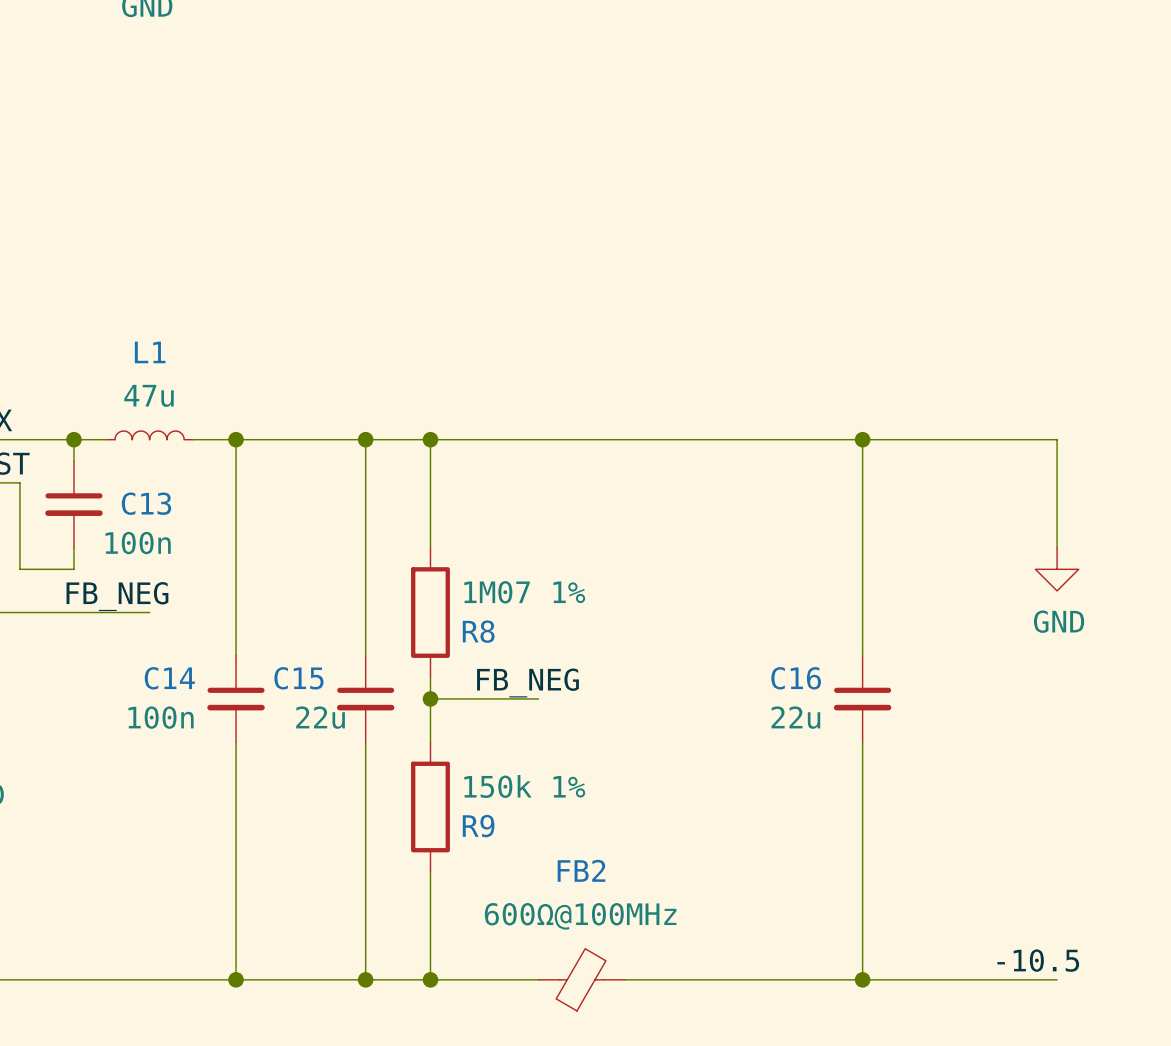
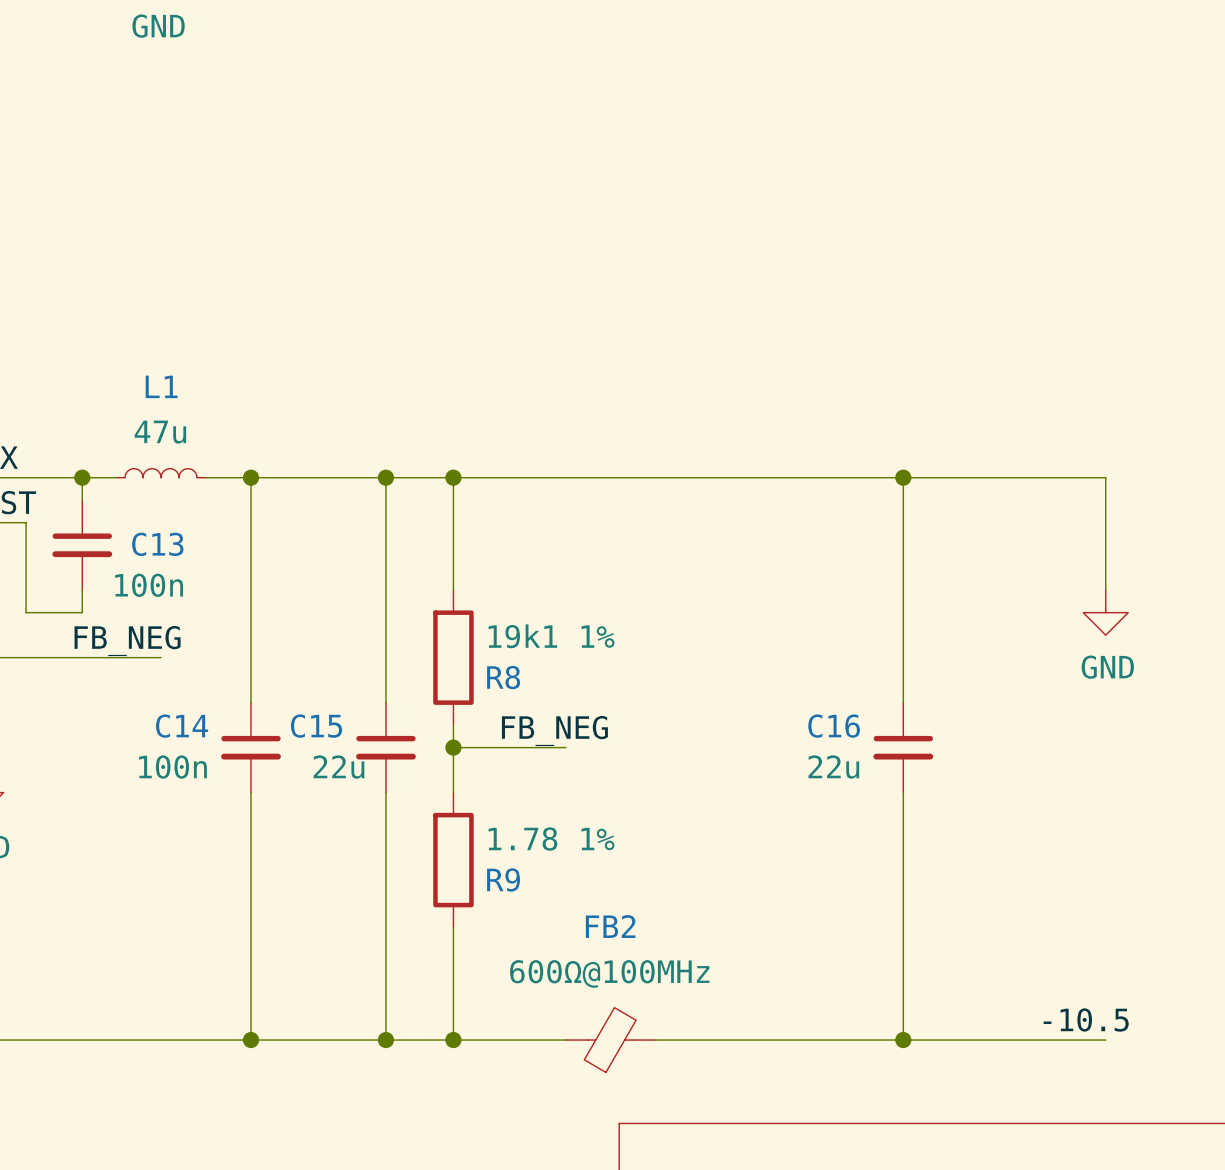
R8 value: 1M07 1% (524, 592) -> 19k1 1% (551, 636)
R9 value: 150k 1% (524, 786) -> 1.78 1% (551, 839)

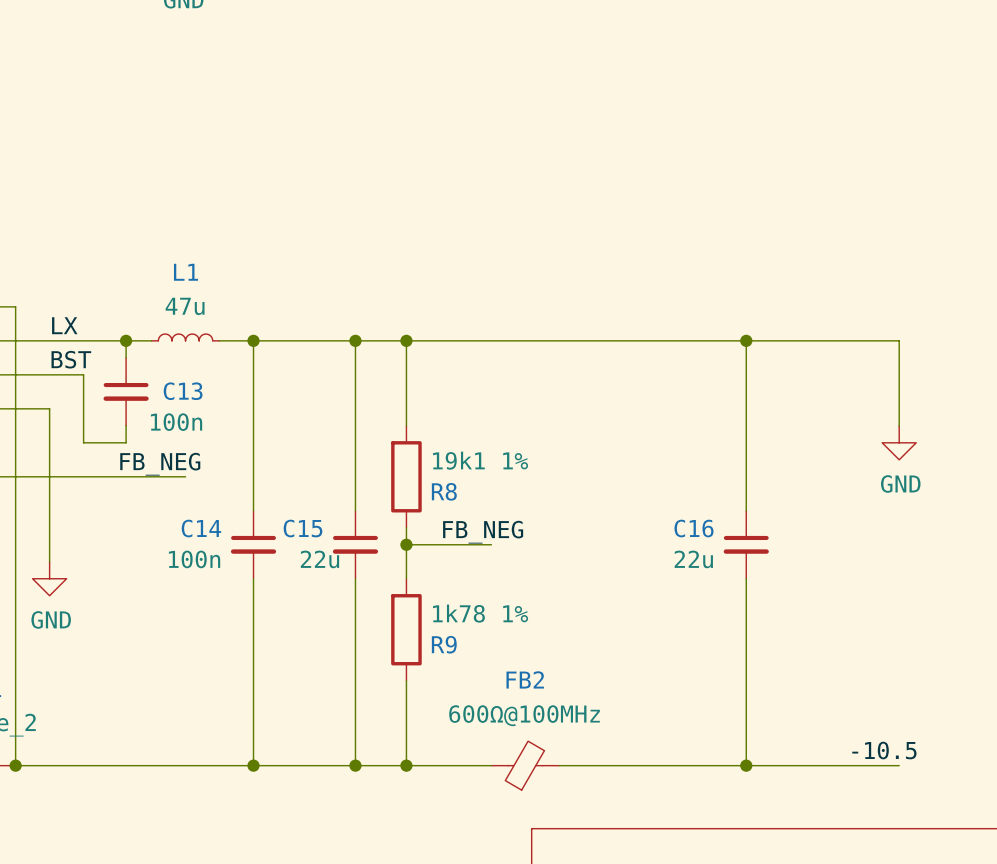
R9 value: 1.78 1% (551, 839) -> 1k78 1% (480, 613)

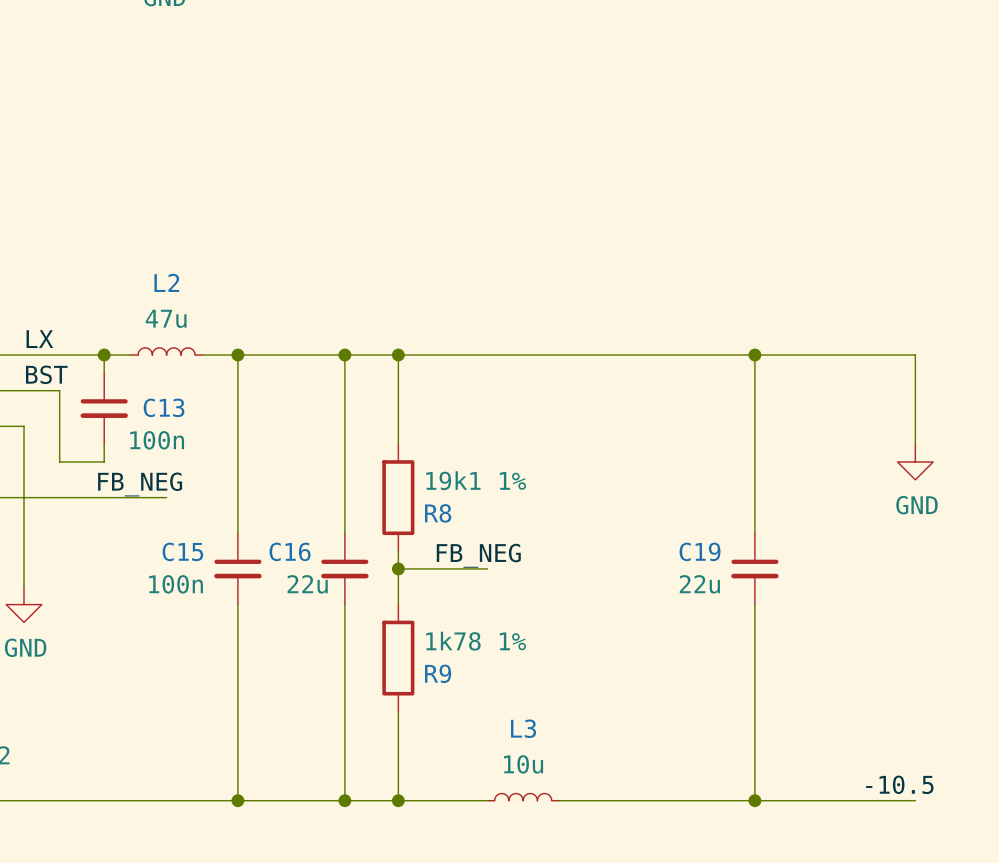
L1 name: L1 (185, 272) -> L2 (166, 282)
C14 name: C14 (201, 528) -> C15 (182, 551)
C15 name: C15 (303, 528) -> C16 (290, 551)
C16 name: C16 (694, 528) -> C19 (700, 551)
L3: none -> 10u (523, 797)
FB2: 600Ω@100MHz (525, 765) -> none

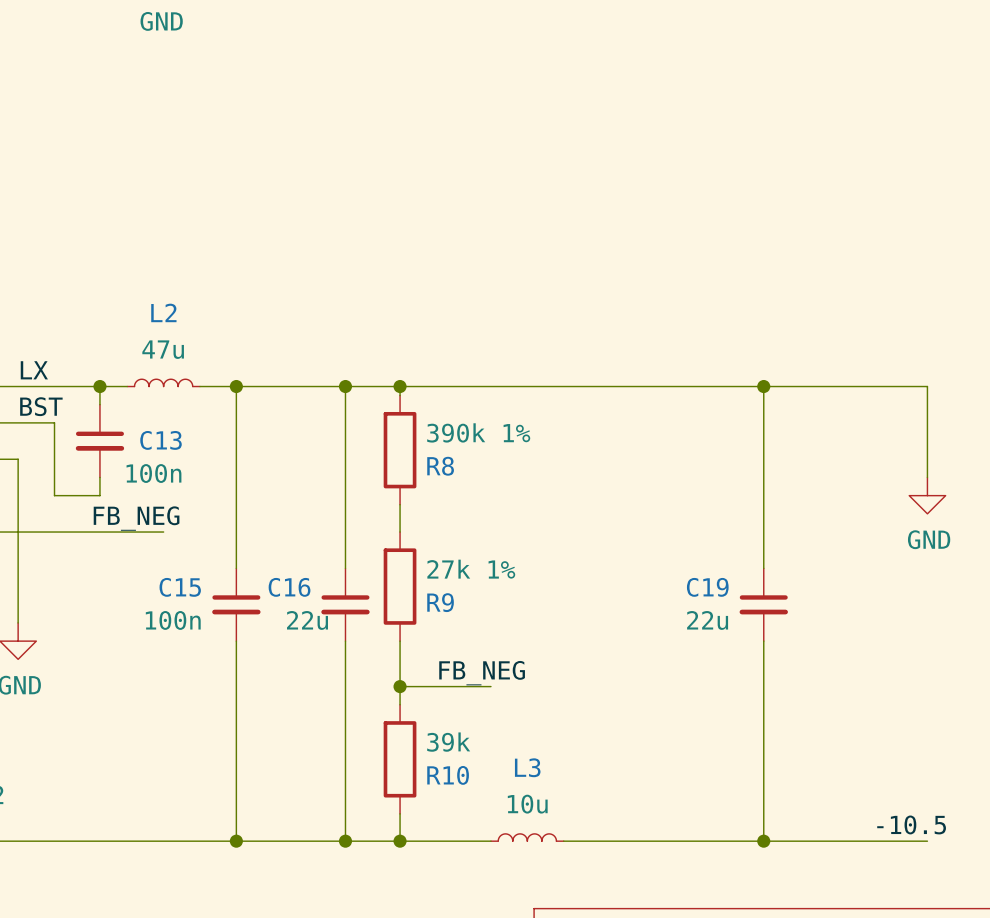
wire: (398, 363) (398, 444) -> none
wire: none -> (400, 504) (400, 532)
R8 value: 19k1 1% (476, 480) -> 390k 1% (478, 432)
R8 position: (398, 497) -> (400, 450)
wire: (398, 551) (398, 604) -> (400, 704) (400, 641)
label position: FB_NEG (478, 555) -> FB_NEG (482, 673)
wire: (398, 568) (487, 568) -> (400, 686) (490, 686)
junction position: (398, 568) -> (400, 686)
R9 value: 1k78 1% (476, 641) -> 27k 1% (471, 569)
R9 position: (398, 658) -> (400, 586)
wire: (398, 711) (398, 773) -> none
R10: none -> 39k (400, 759)

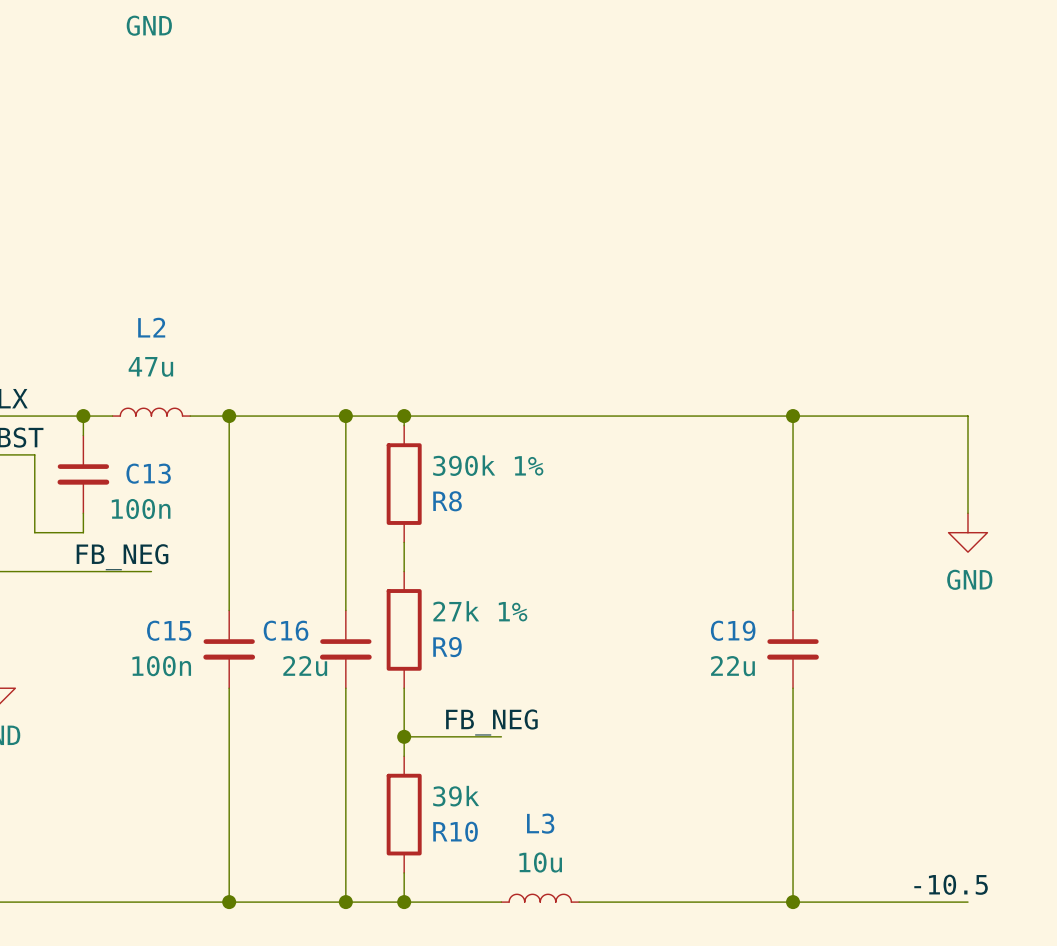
L2 flip: as is (163, 382) -> left-right (151, 412)

